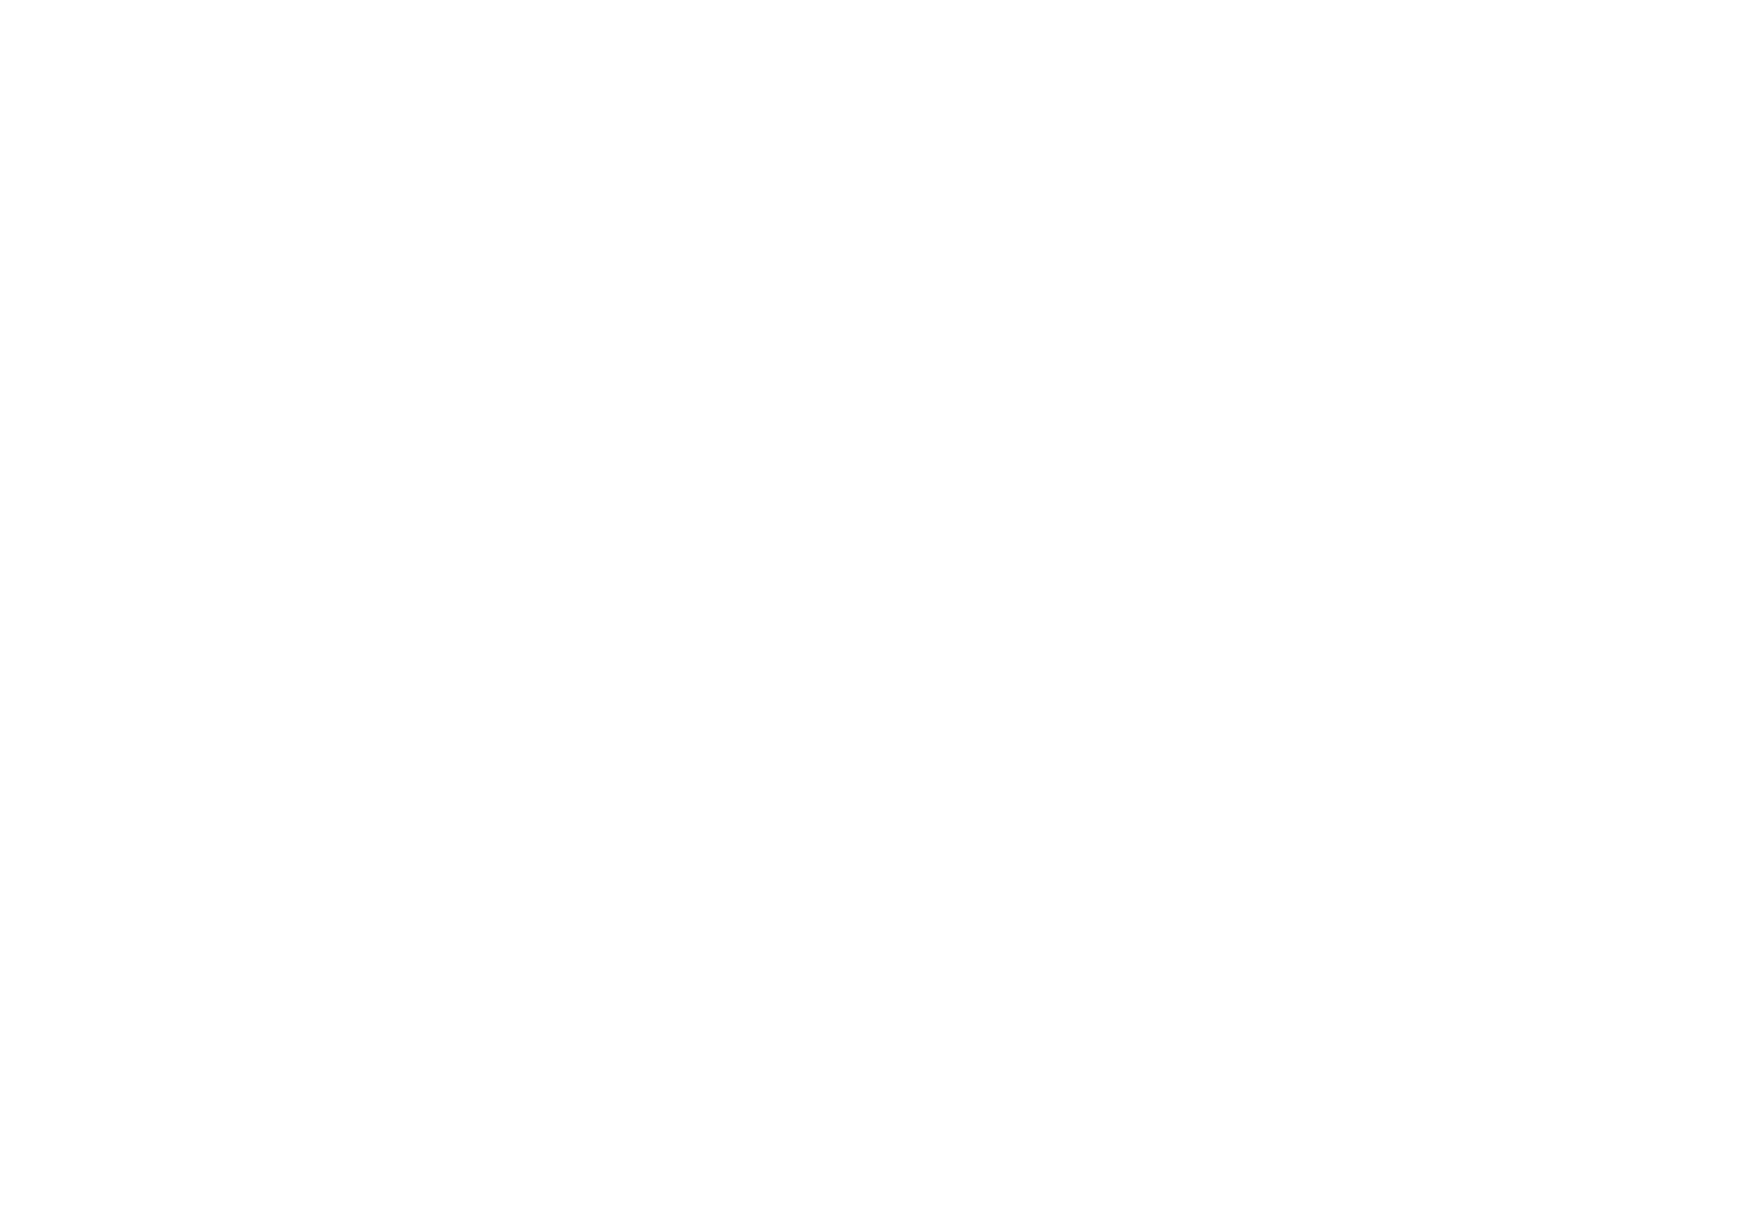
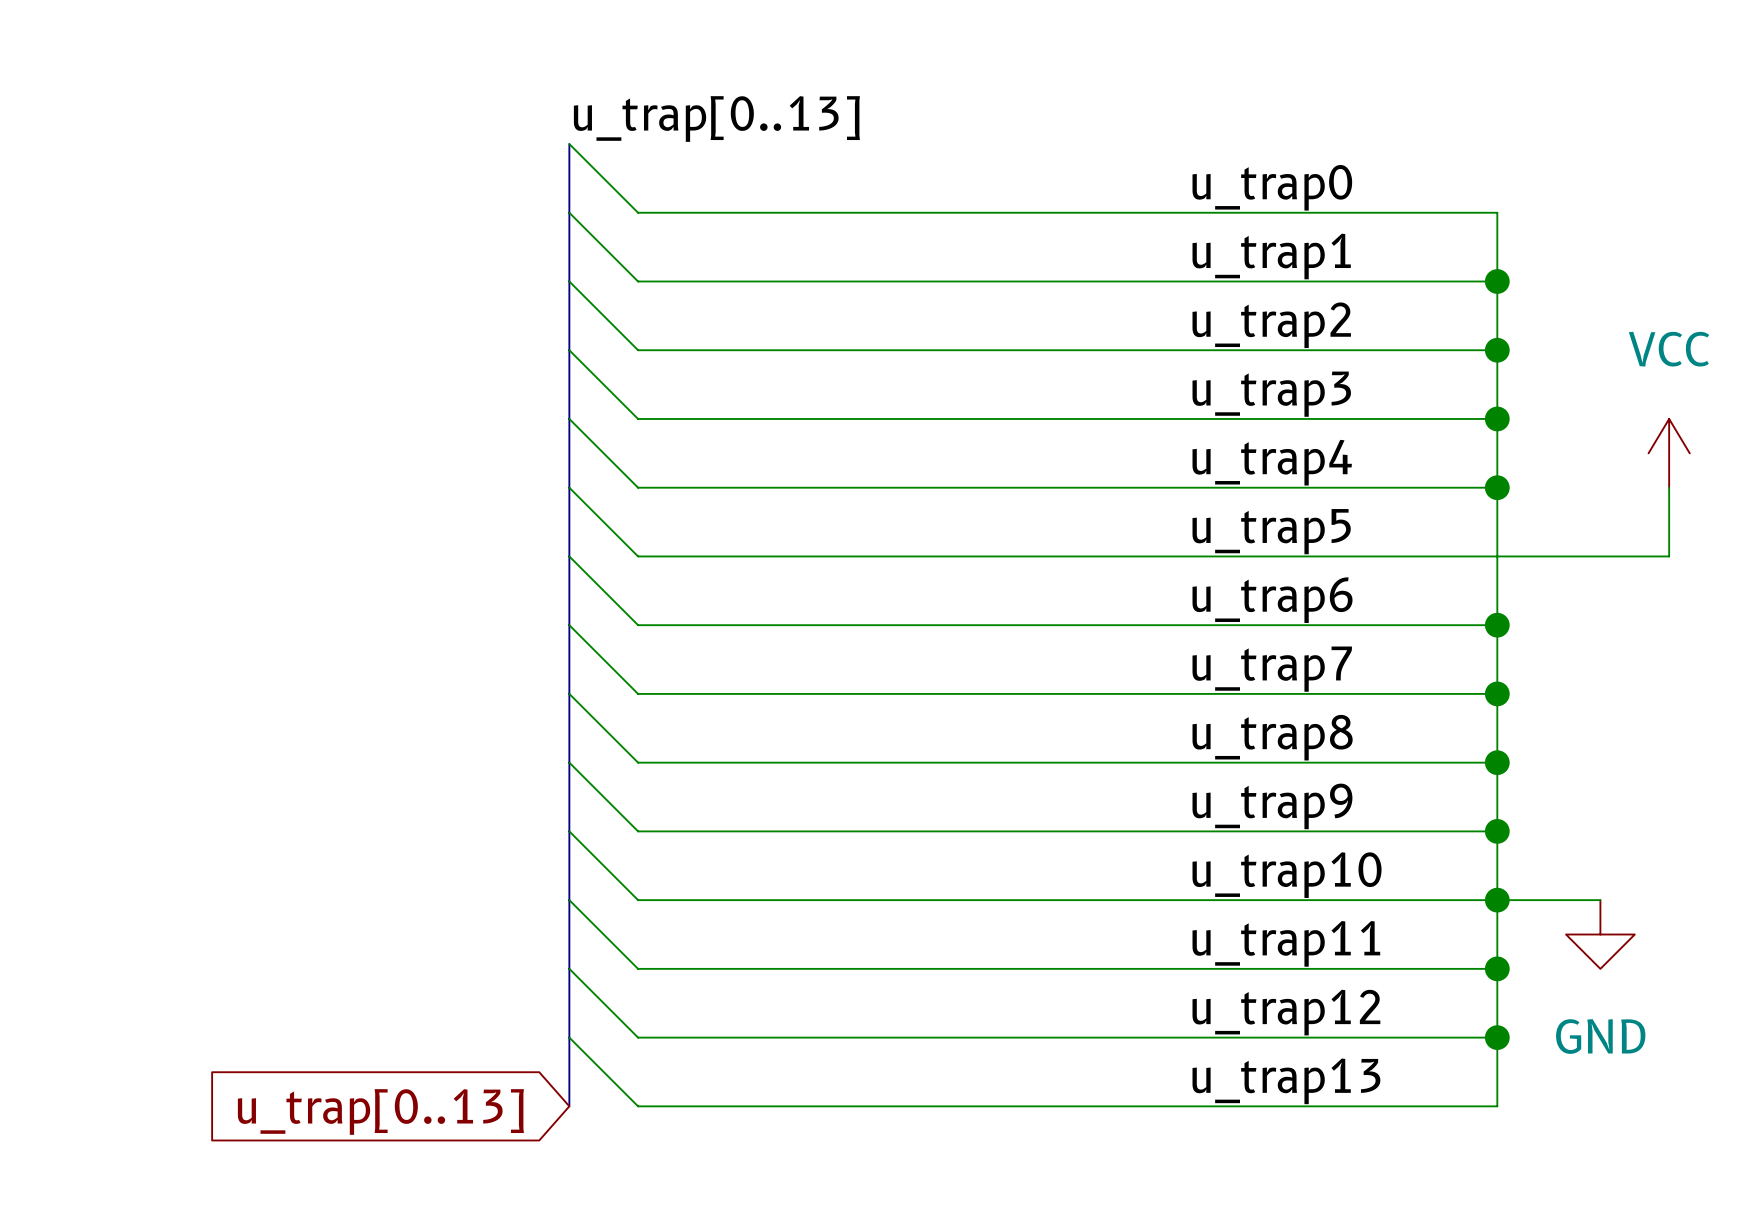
label: none -> u_trap[0..13] (716, 119)
wire: none -> (569, 144) (638, 212) (1497, 212) (1497, 1106) (638, 1106) (569, 1037)
bus: none -> (569, 144) (569, 1106)
label: none -> u_trap0 (1272, 187)
wire: none -> (569, 212) (638, 281) (1497, 281)
label: none -> u_trap1 (1271, 256)
wire: none -> (569, 281) (638, 350) (1497, 350)
junction: none -> (1497, 281)
label: none -> u_trap2 (1271, 325)
wire: none -> (569, 350) (638, 418) (1497, 418)
junction: none -> (1497, 350)
label: none -> u_trap3 (1271, 394)
wire: none -> (569, 418) (638, 487) (1497, 487)
junction: none -> (1497, 418)
power symbol: none -> VCC (1669, 453)
label: none -> u_trap4 (1272, 462)
wire: none -> (569, 487) (638, 556) (1669, 556) (1669, 487)
junction: none -> (1497, 487)
label: none -> u_trap5 (1271, 531)
wire: none -> (569, 556) (638, 625) (1497, 625)
label: none -> u_trap6 (1272, 600)
wire: none -> (569, 625) (638, 693) (1497, 693)
junction: none -> (1497, 625)
label: none -> u_trap7 (1272, 669)
wire: none -> (569, 693) (638, 762) (1497, 762)
junction: none -> (1497, 693)
label: none -> u_trap8 (1272, 737)
wire: none -> (569, 762) (638, 831) (1497, 831)
junction: none -> (1497, 762)
label: none -> u_trap9 (1272, 806)
wire: none -> (569, 831) (638, 900) (1600, 900)
junction: none -> (1497, 831)
label: none -> u_trap10 (1287, 875)
wire: none -> (569, 900) (638, 968) (1497, 968)
junction: none -> (1497, 900)
power symbol: none -> GND (1600, 934)
label: none -> u_trap11 (1286, 943)
wire: none -> (569, 968) (638, 1037) (1497, 1037)
junction: none -> (1497, 968)
label: none -> u_trap12 (1286, 1012)
junction: none -> (1497, 1037)
label: none -> u_trap13 (1286, 1081)
global label: none -> u_trap[0..13] (380, 1112)

